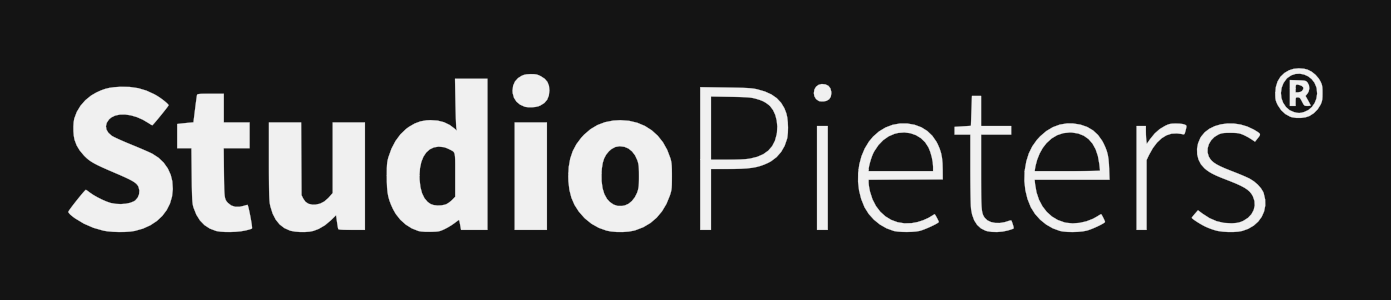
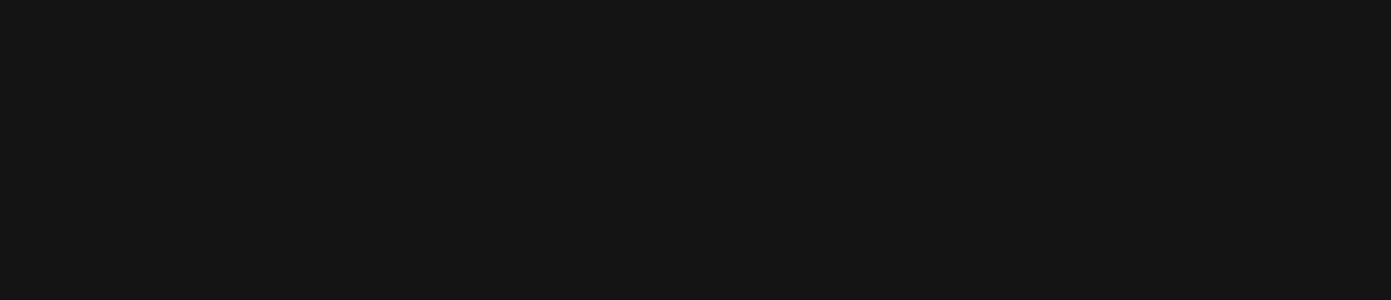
drawing: [68, 68, 1323, 233] -> none

